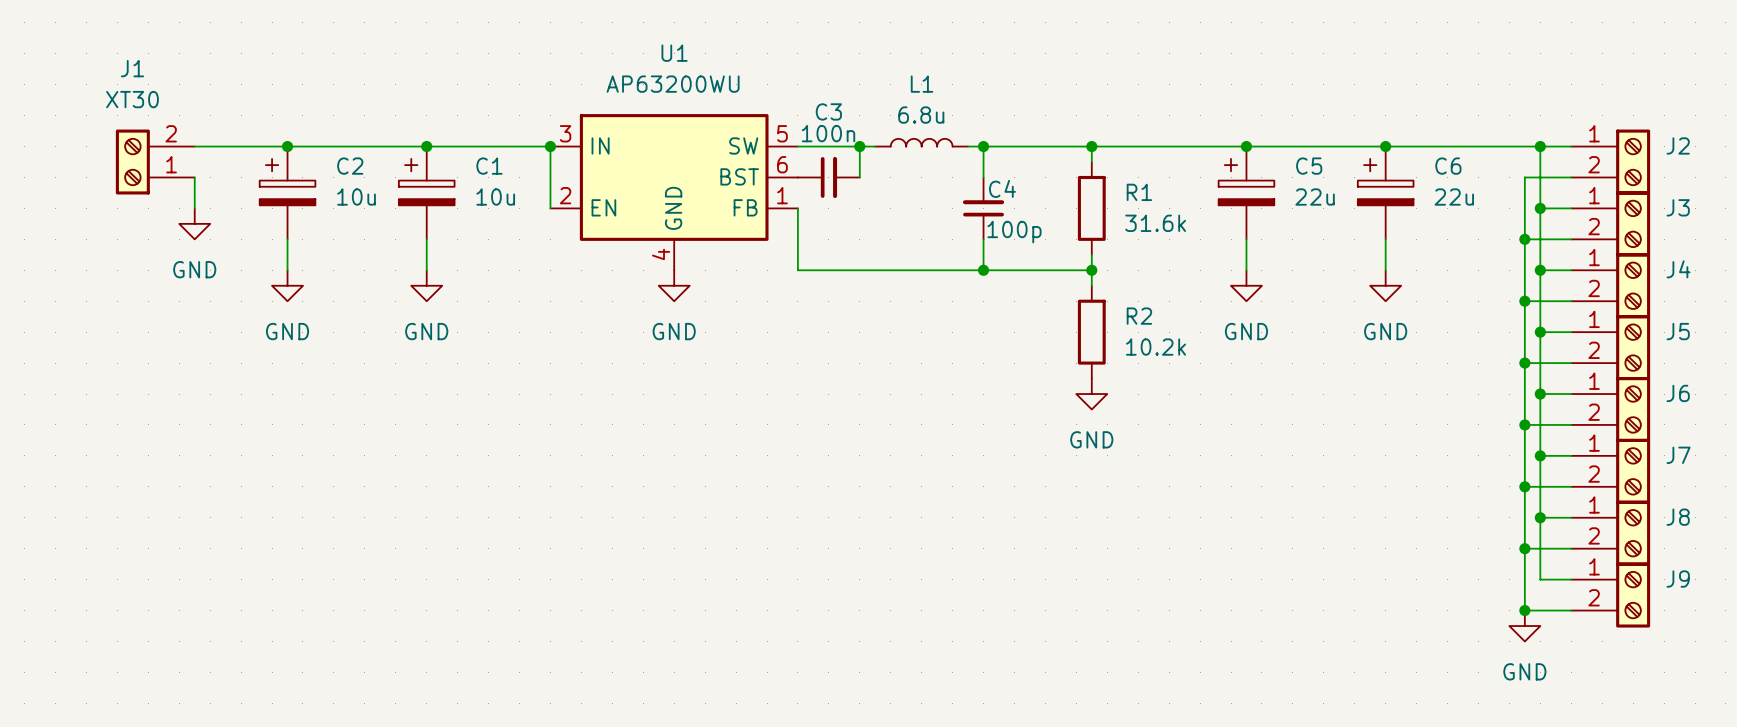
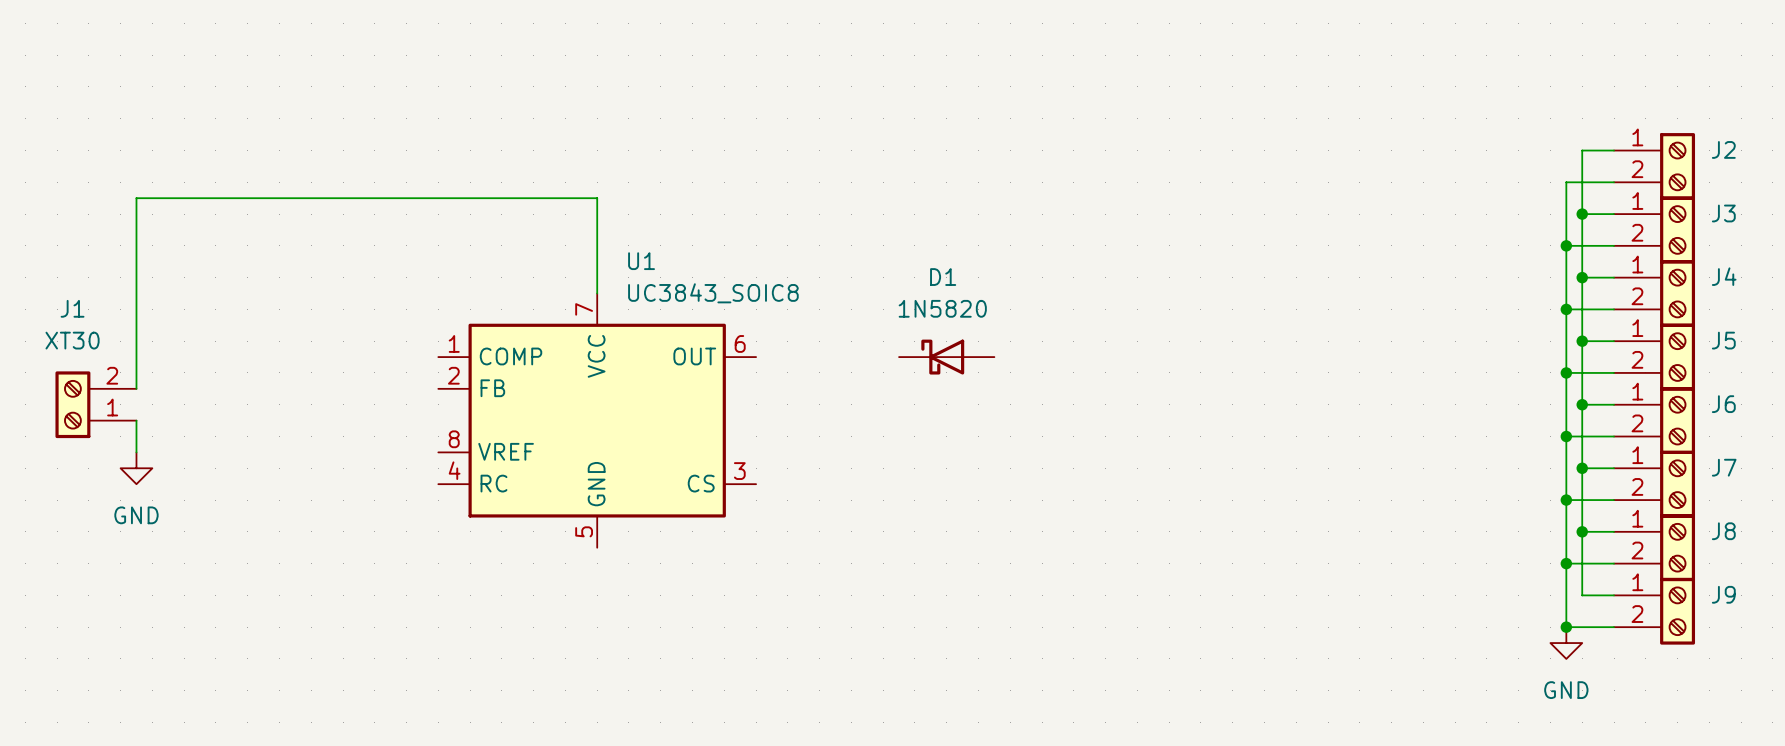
U1 name position: U1 (674, 53) -> U1 (641, 261)
U1 value: AP63200WU (673, 84) -> UC3843_SOIC8 (713, 293)
U1 symbol: [550, 114, 798, 271] -> [438, 293, 757, 548]
L1: 6.8u (921, 142) -> none
wire: (194, 146) (550, 146) (550, 208) -> none
junction: (287, 146) -> none
junction: (426, 146) -> none
junction: (550, 146) -> none
wire: (797, 146) (875, 146) -> none
wire: (859, 146) (859, 177) -> none
junction: (859, 146) -> none
wire: (968, 146) (1540, 146) -> none
wire: (983, 146) (983, 177) -> none
junction: (983, 146) -> none
wire: (1091, 146) (1091, 162) -> none
junction: (1091, 146) -> none
junction: (1246, 146) -> none
junction: (1385, 146) -> none
junction: (1540, 146) -> none
J1 position: (155, 162) -> (95, 404)
wire: (194, 177) (194, 208) -> none
C3: 100n (828, 177) -> none
C2: 10u (287, 192) -> none
C1: 10u (426, 192) -> none
C5: 22u (1246, 192) -> none
C6: 22u (1385, 192) -> none
wire: (797, 208) (797, 270) (1091, 270) -> none
C4: 100p (983, 208) -> none
R1: 31.6k (1091, 208) -> none
power symbol: GND (194, 223) -> none
wire: (287, 239) (287, 270) -> (136, 420) (136, 452)
wire: (426, 239) (426, 270) -> none
wire: (983, 239) (983, 270) -> none
wire: (1246, 239) (1246, 270) -> none
wire: (1385, 239) (1385, 270) -> none
wire: (1091, 254) (1091, 285) -> none
junction: (983, 270) -> none
junction: (1091, 270) -> none
power symbol: GND (287, 285) -> none
power symbol: GND (426, 285) -> none
wire: none -> (597, 293) (597, 198) (136, 198) (136, 388)
power symbol: GND (674, 285) -> none
power symbol: GND (1246, 285) -> none
power symbol: GND (1385, 285) -> none
R2: 10.2k (1091, 332) -> none
D1: none -> 1N5820 (946, 357)
power symbol: GND (1091, 394) -> none
power symbol: none -> GND (136, 468)

